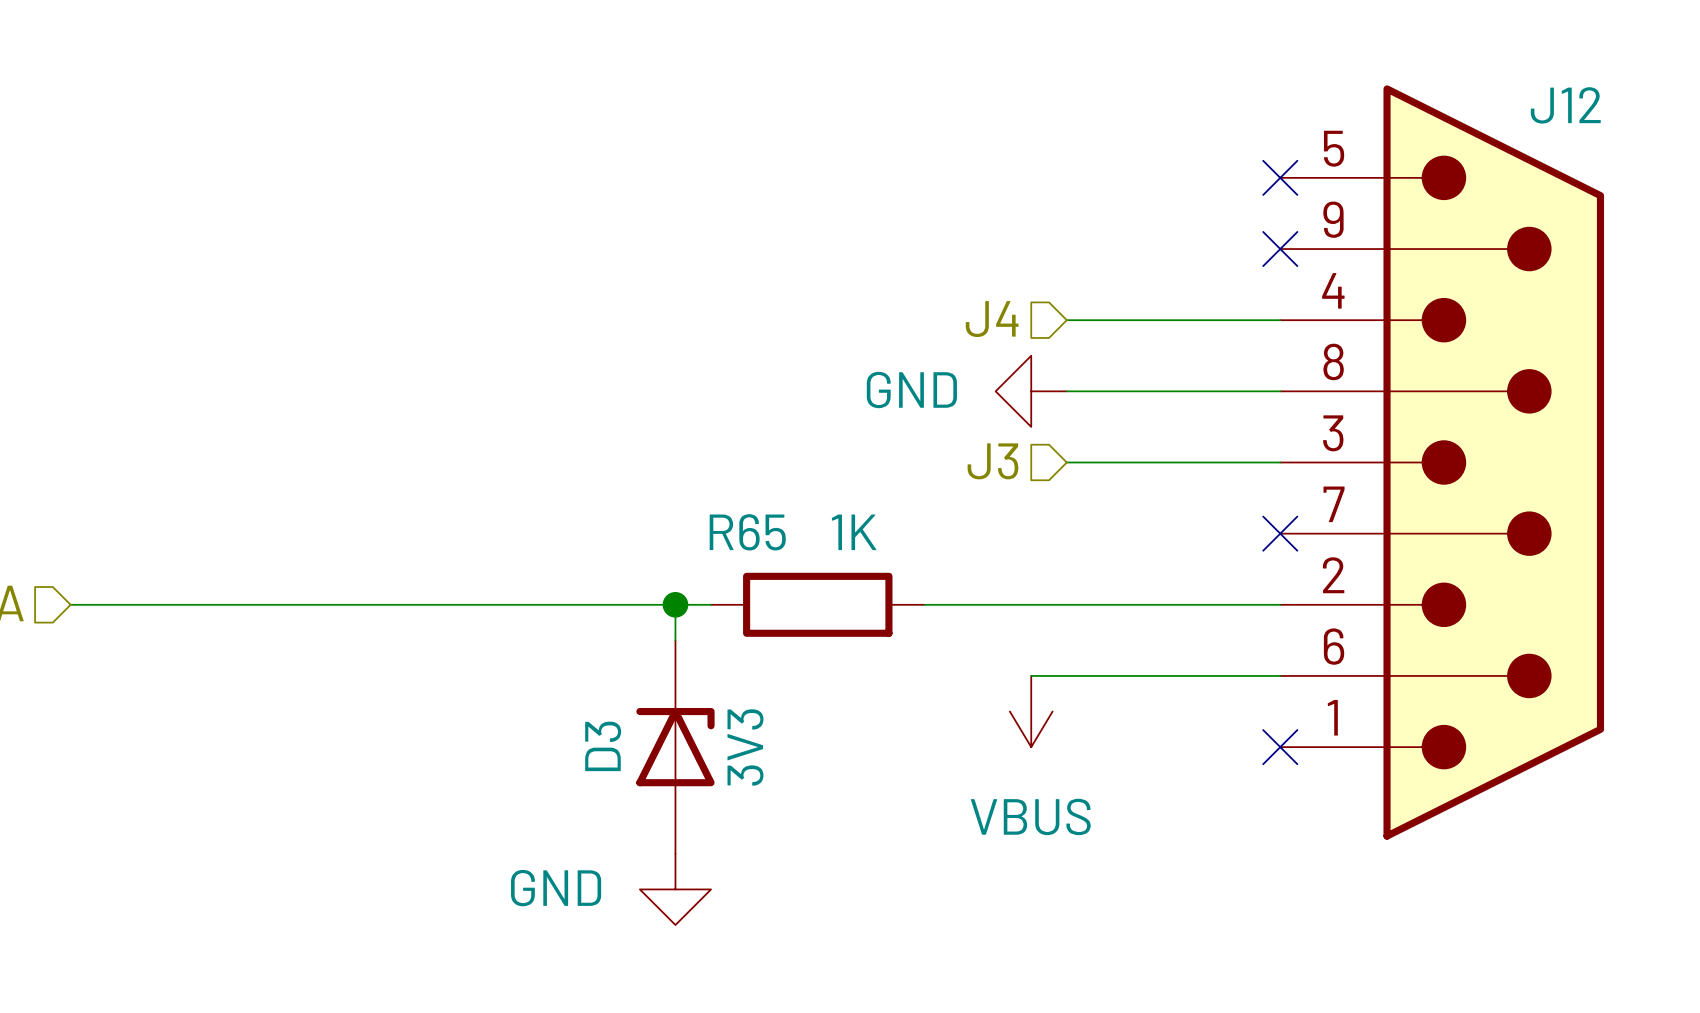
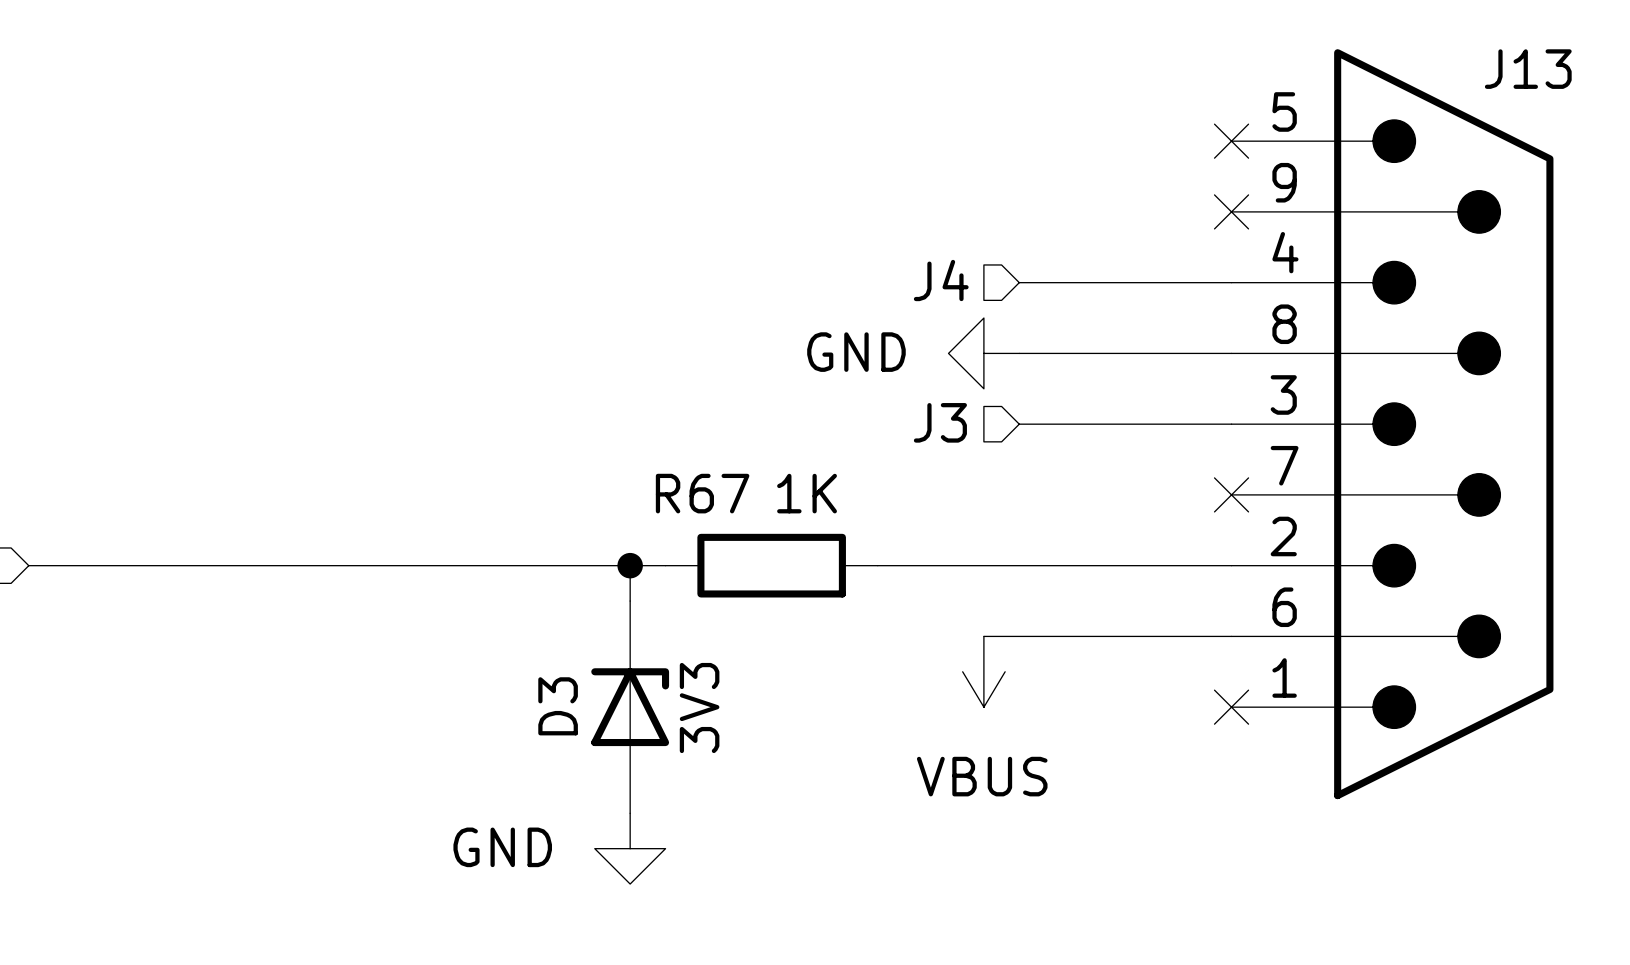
J12 name: J12 (1565, 105) -> J13 (1528, 69)
R65 name: R65 (747, 532) -> R67 (702, 493)

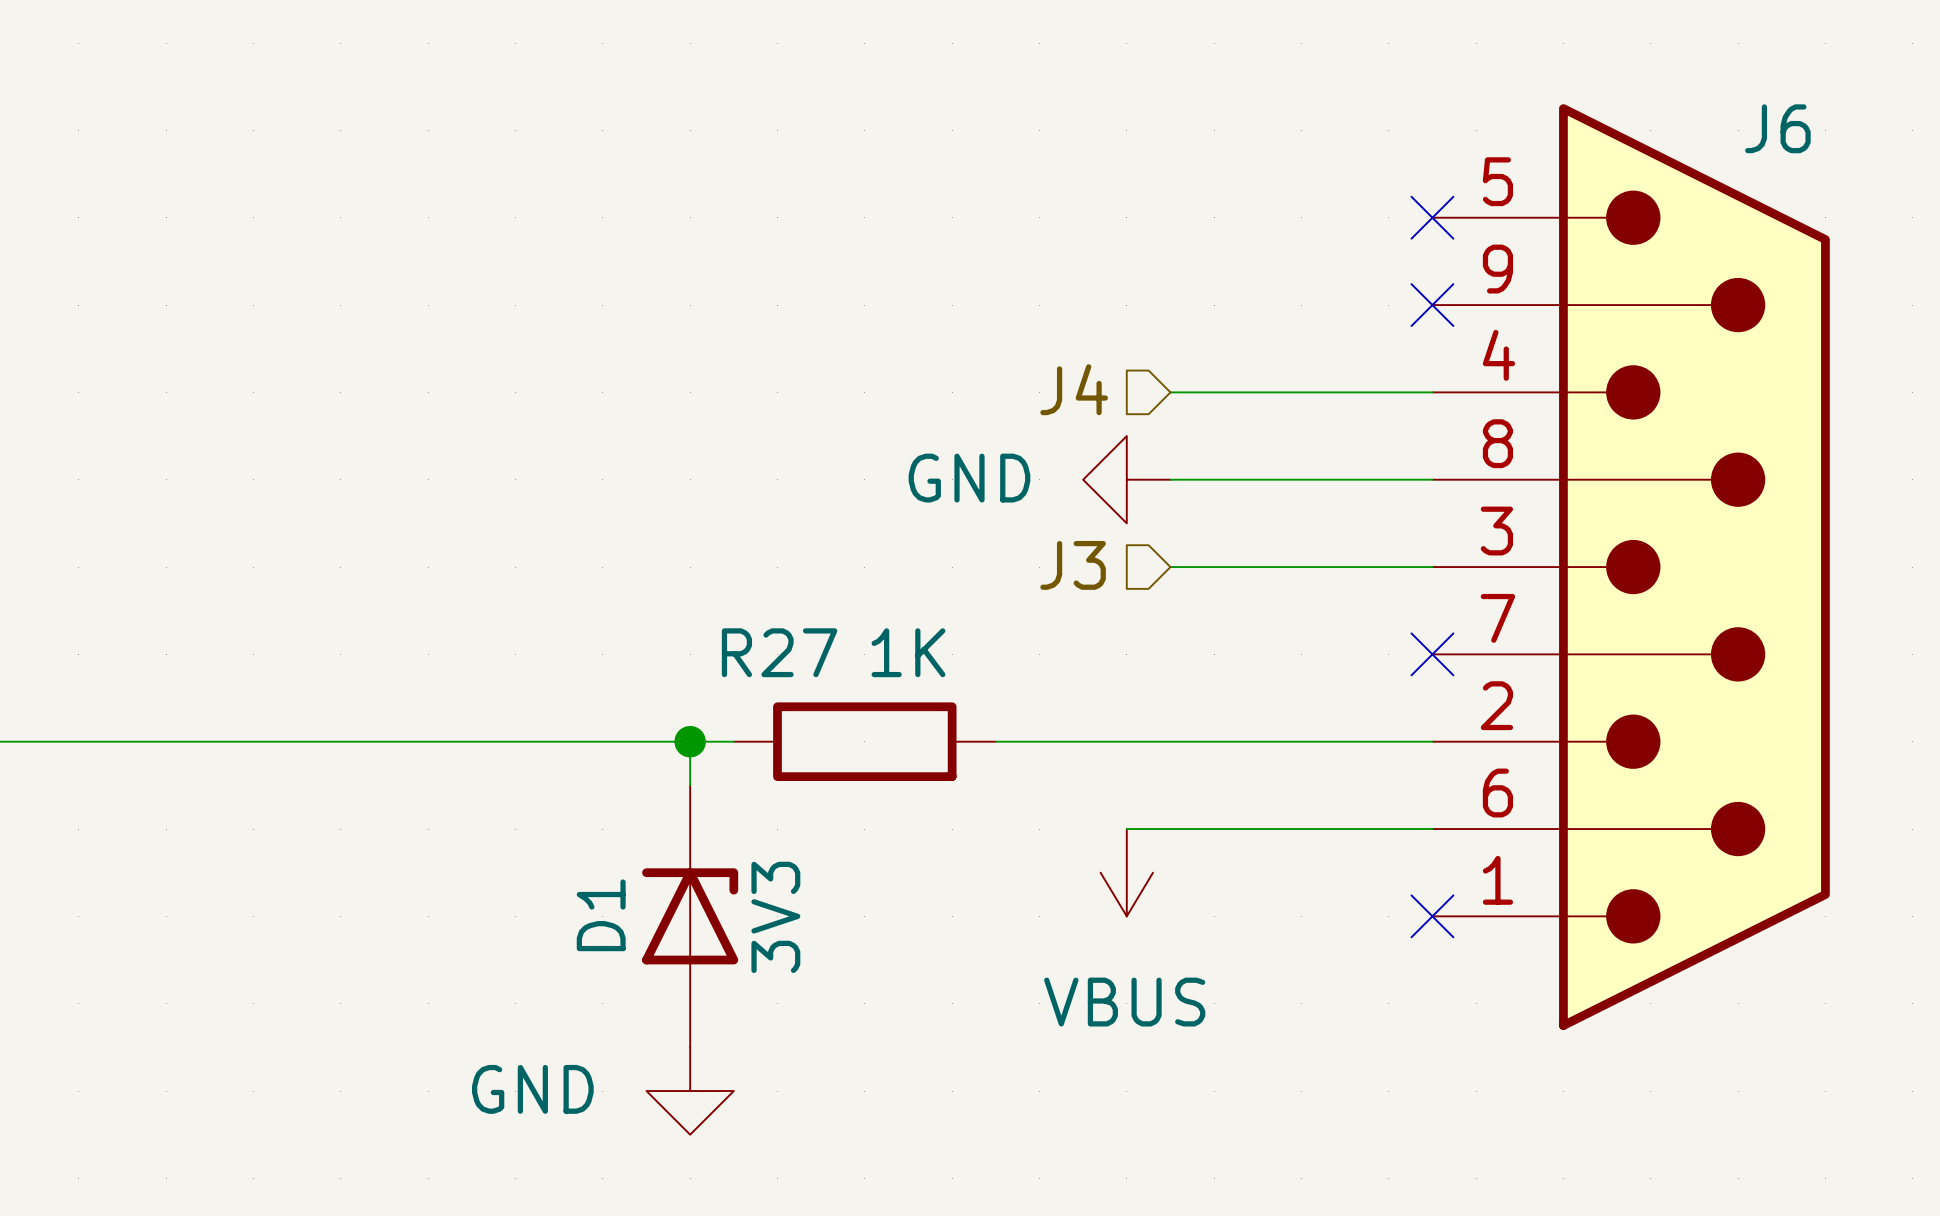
J13 name: J13 (1528, 69) -> J6 (1777, 128)
R67 name: R67 (702, 493) -> R27 (779, 652)
D3 name: D3 (558, 706) -> D1 (601, 915)

